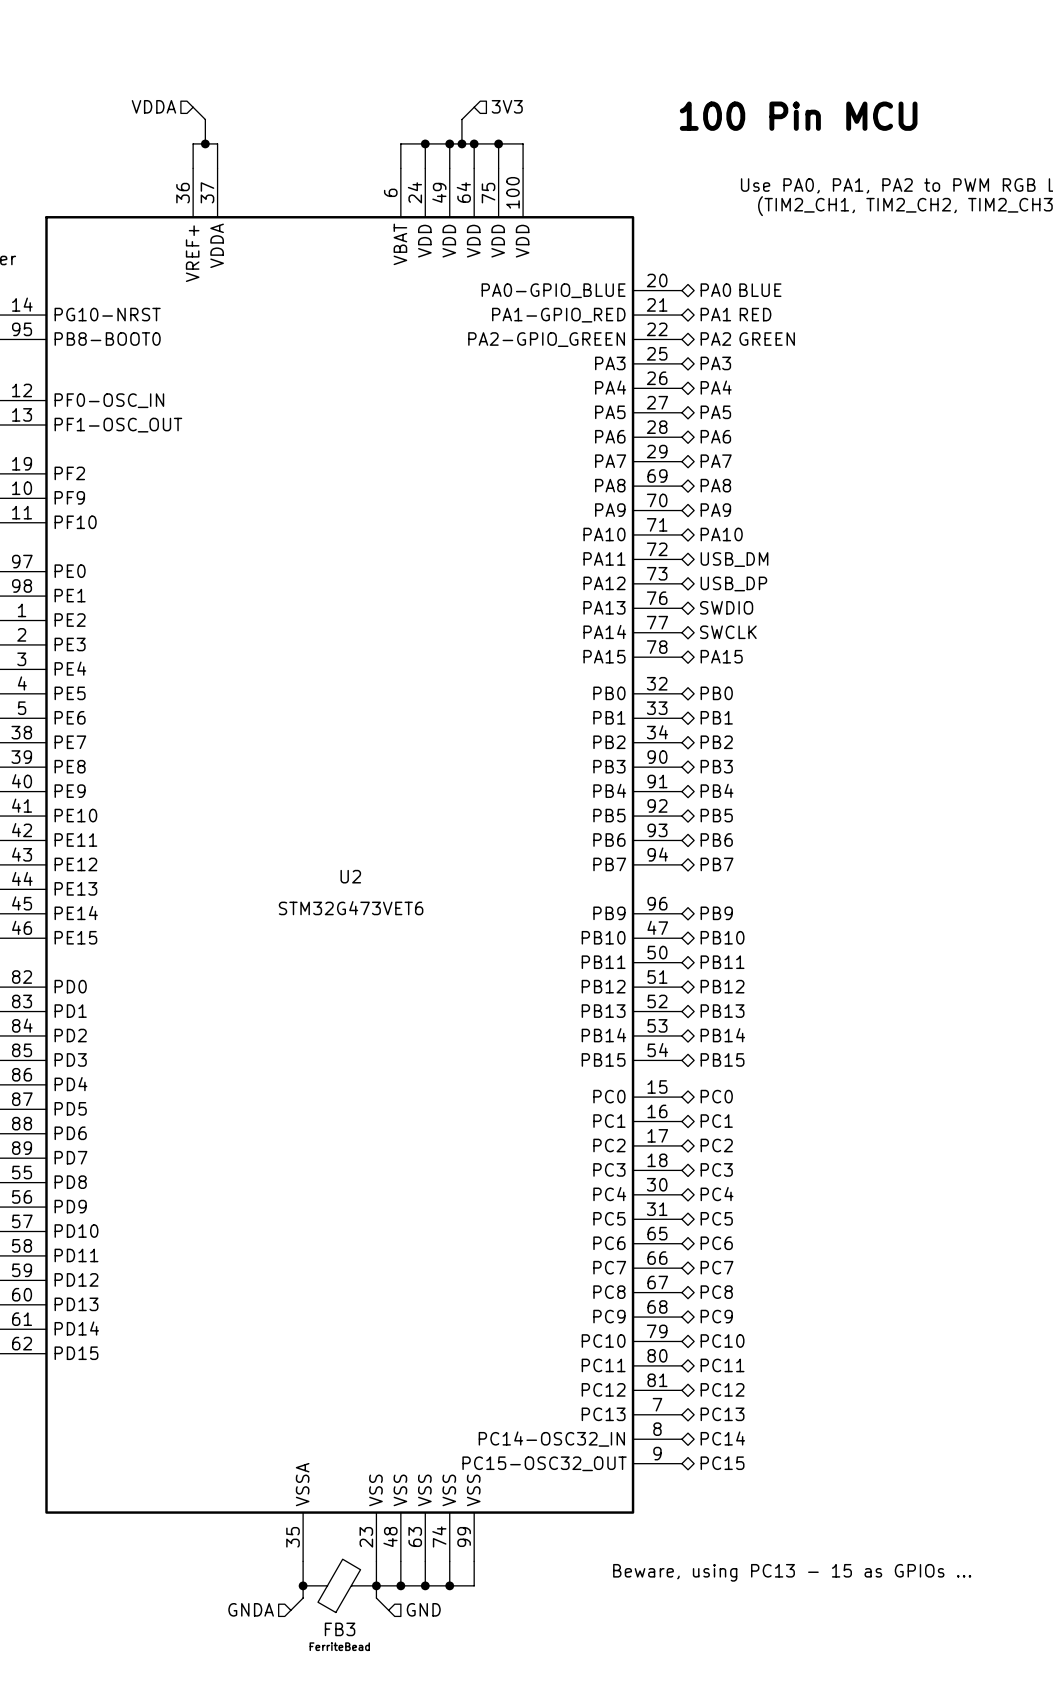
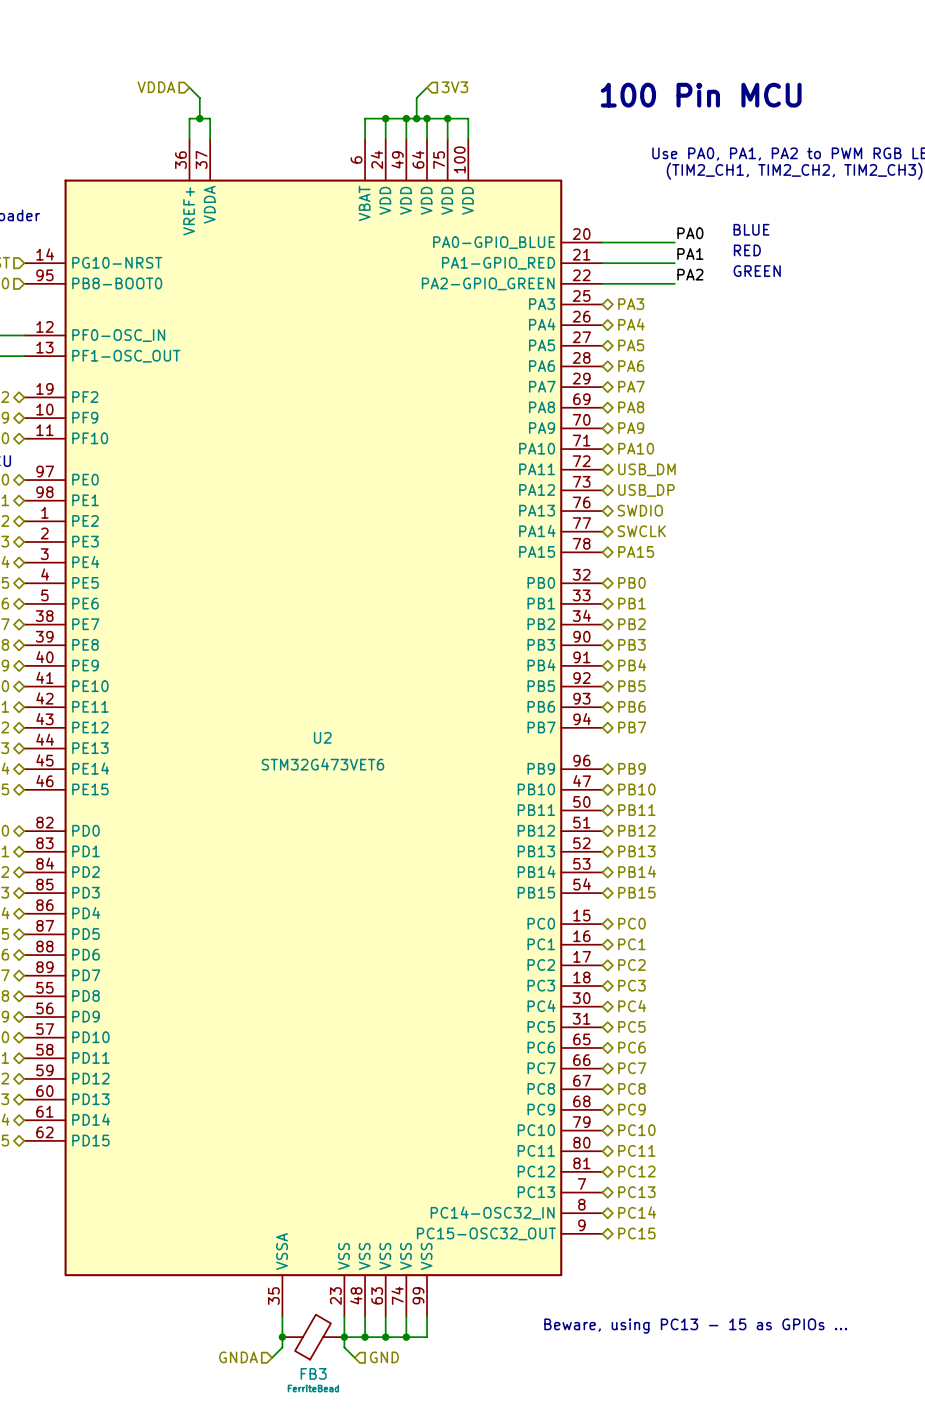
label: none -> PA0 (690, 233)
wire: none -> (602, 242) (674, 242)
hierarchical label: PA0 (715, 290) -> none
text position: BLUE (760, 290) -> BLUE (751, 229)
label: none -> PA1 (690, 253)
hierarchical label: PA1 (715, 314) -> none
text position: RED (755, 314) -> RED (747, 250)
wire: none -> (602, 263) (674, 263)
label: none -> PA2 (690, 274)
wire: none -> (602, 283) (674, 283)
hierarchical label: PA2 (715, 339) -> none
text position: GREEN (767, 339) -> GREEN (757, 271)

